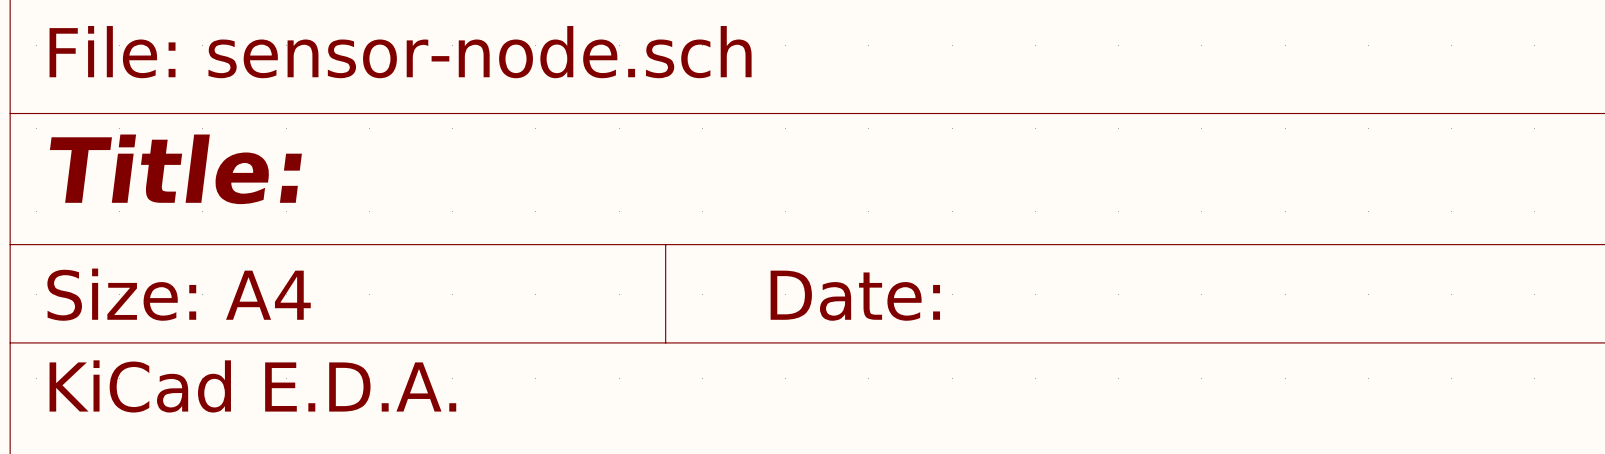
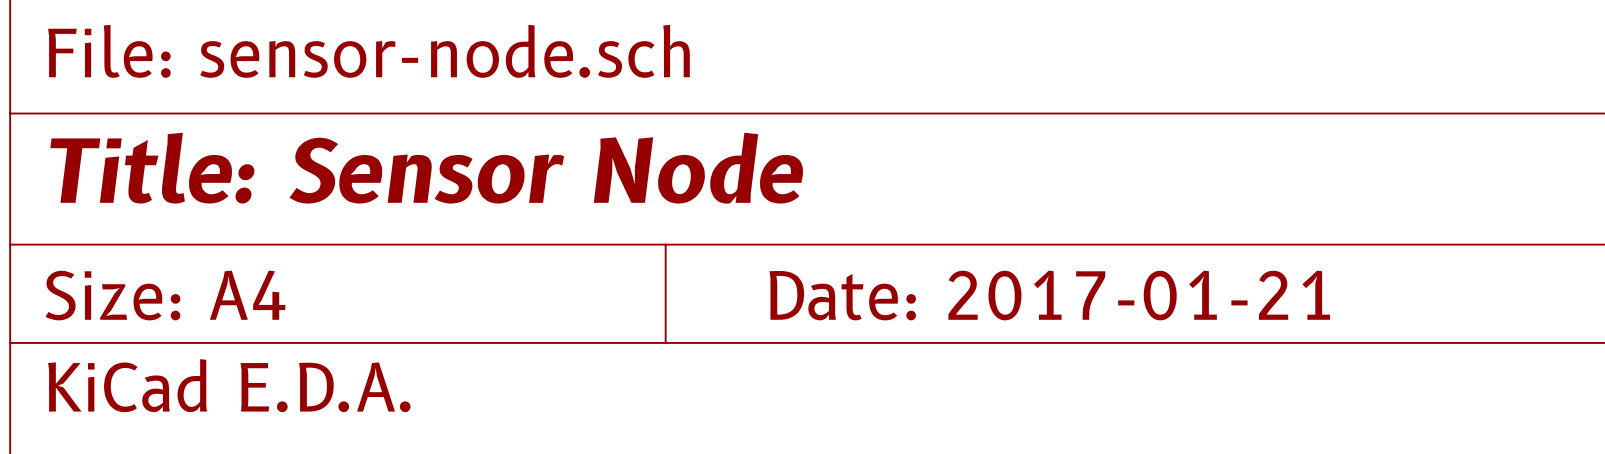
title block: Title: (175, 169) -> Title: Sensor Node (426, 168)
title block: Date: (855, 295) -> Date: 2017-01-21 (1049, 295)

